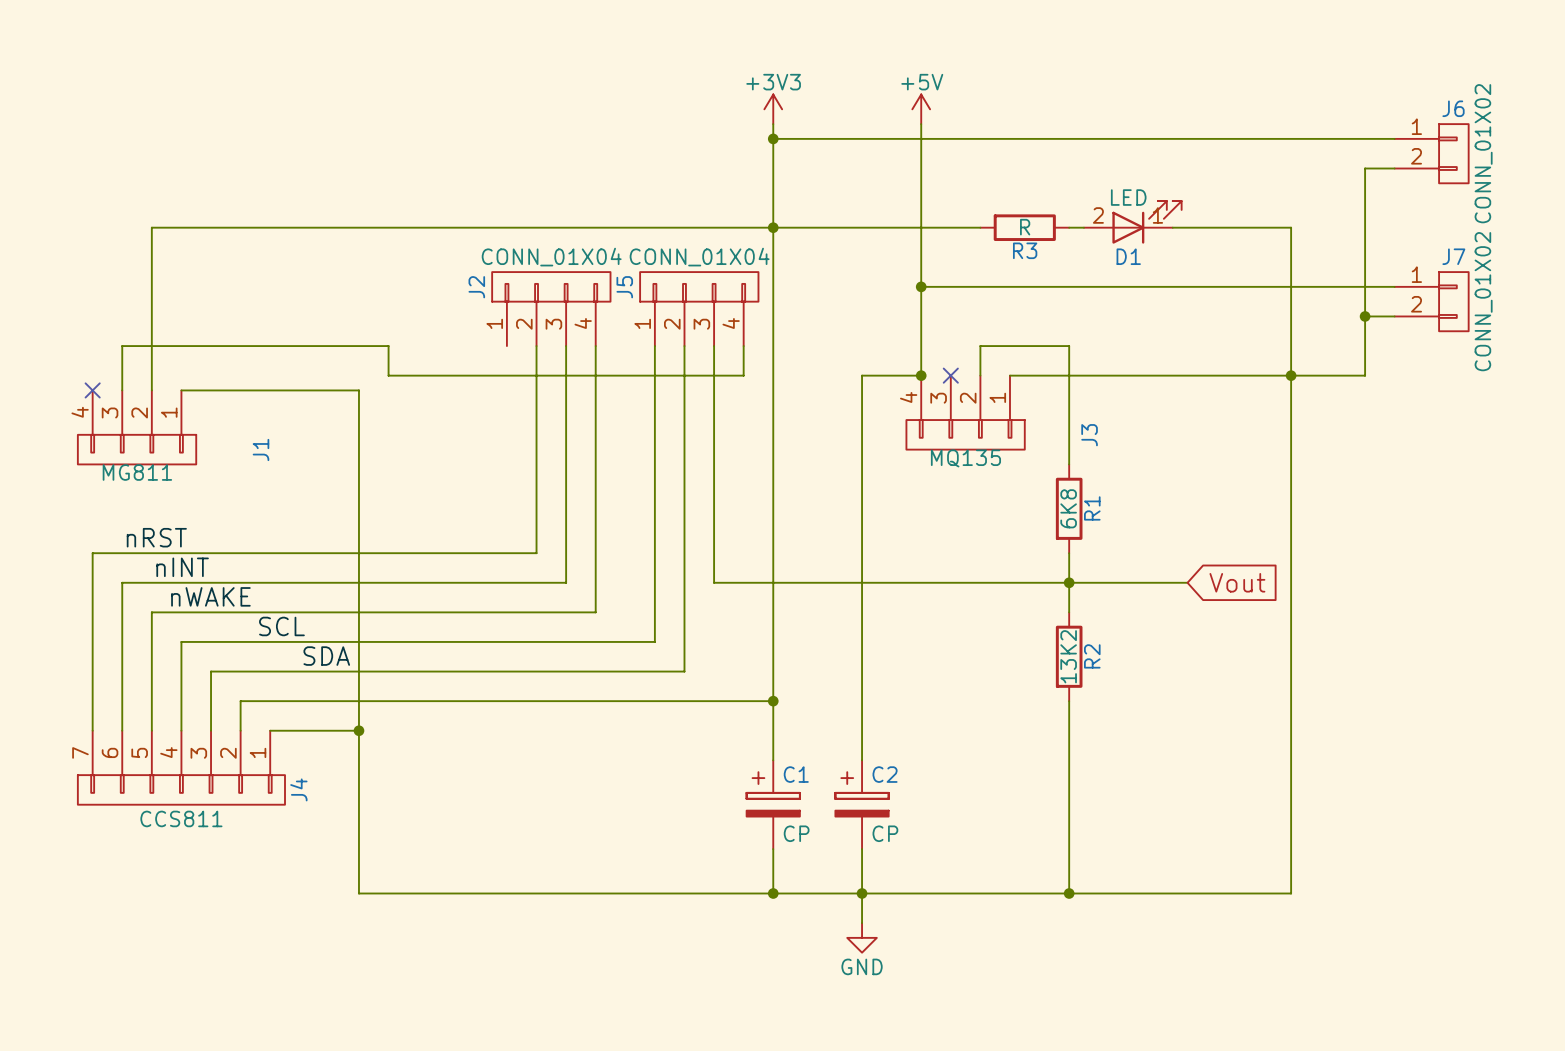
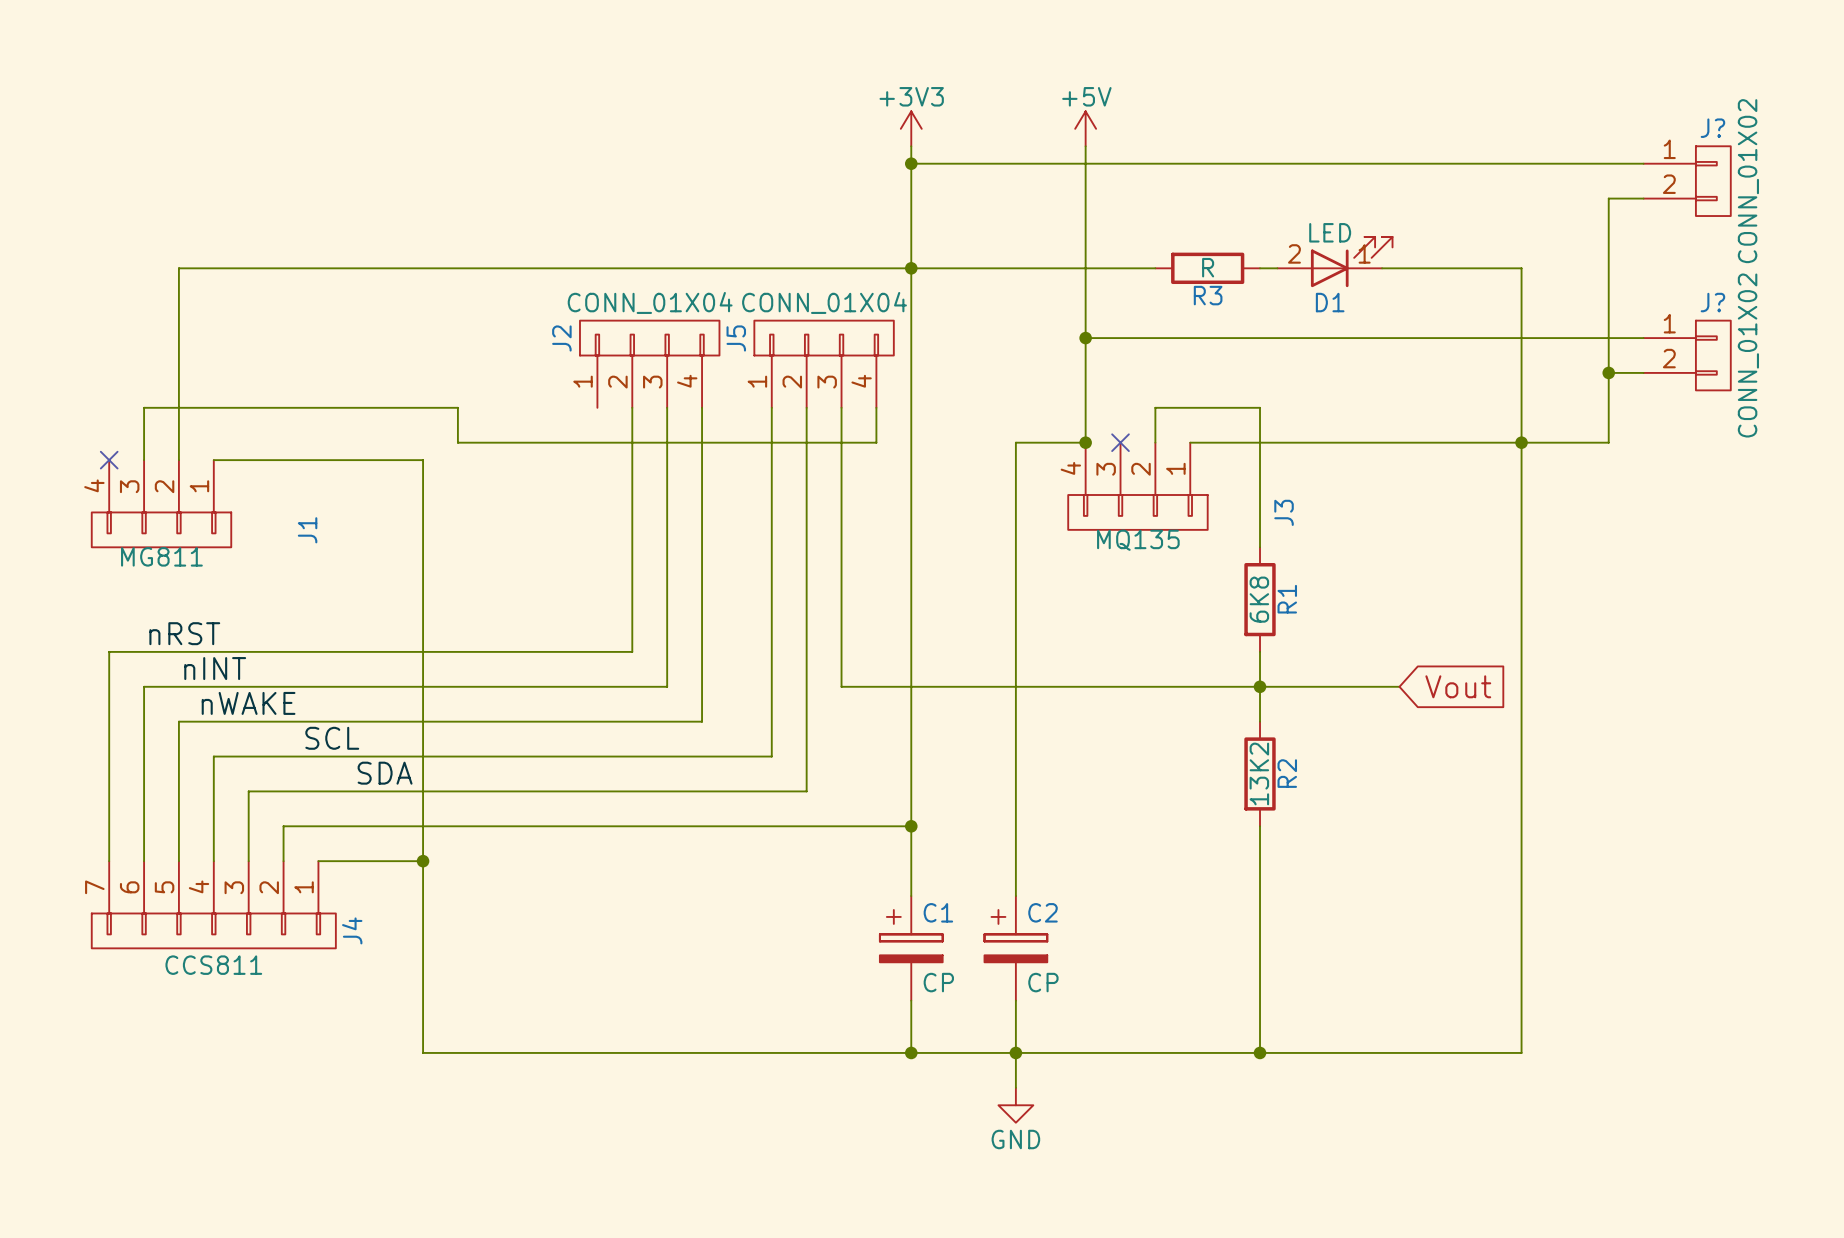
J6 name: J6 (1453, 108) -> J? (1712, 128)
J7 name: J7 (1453, 256) -> J? (1712, 302)

